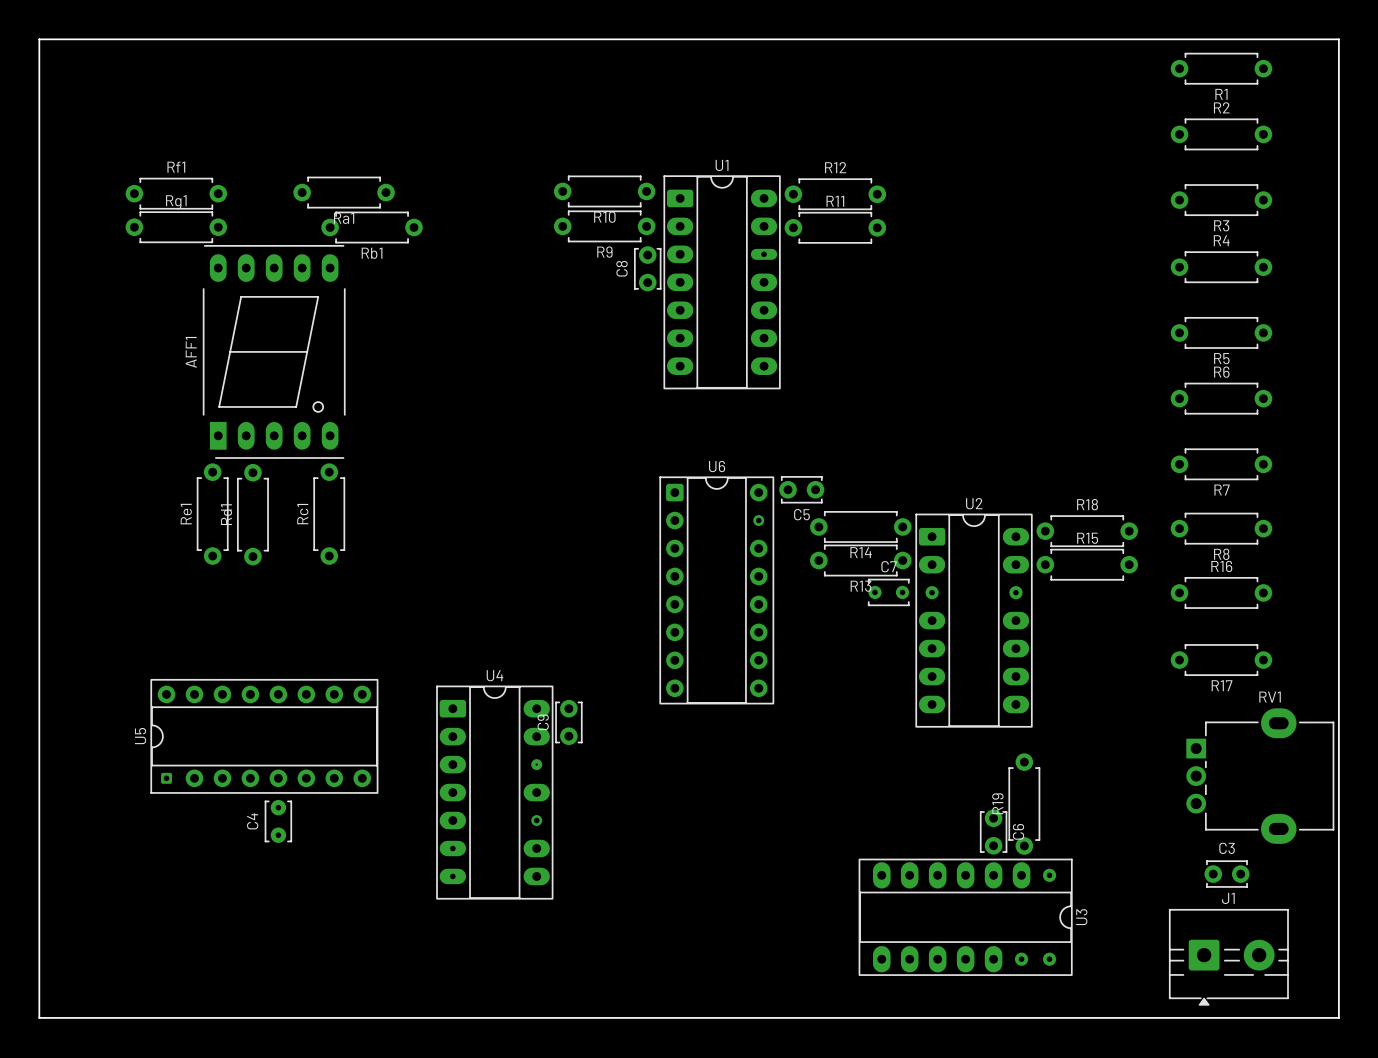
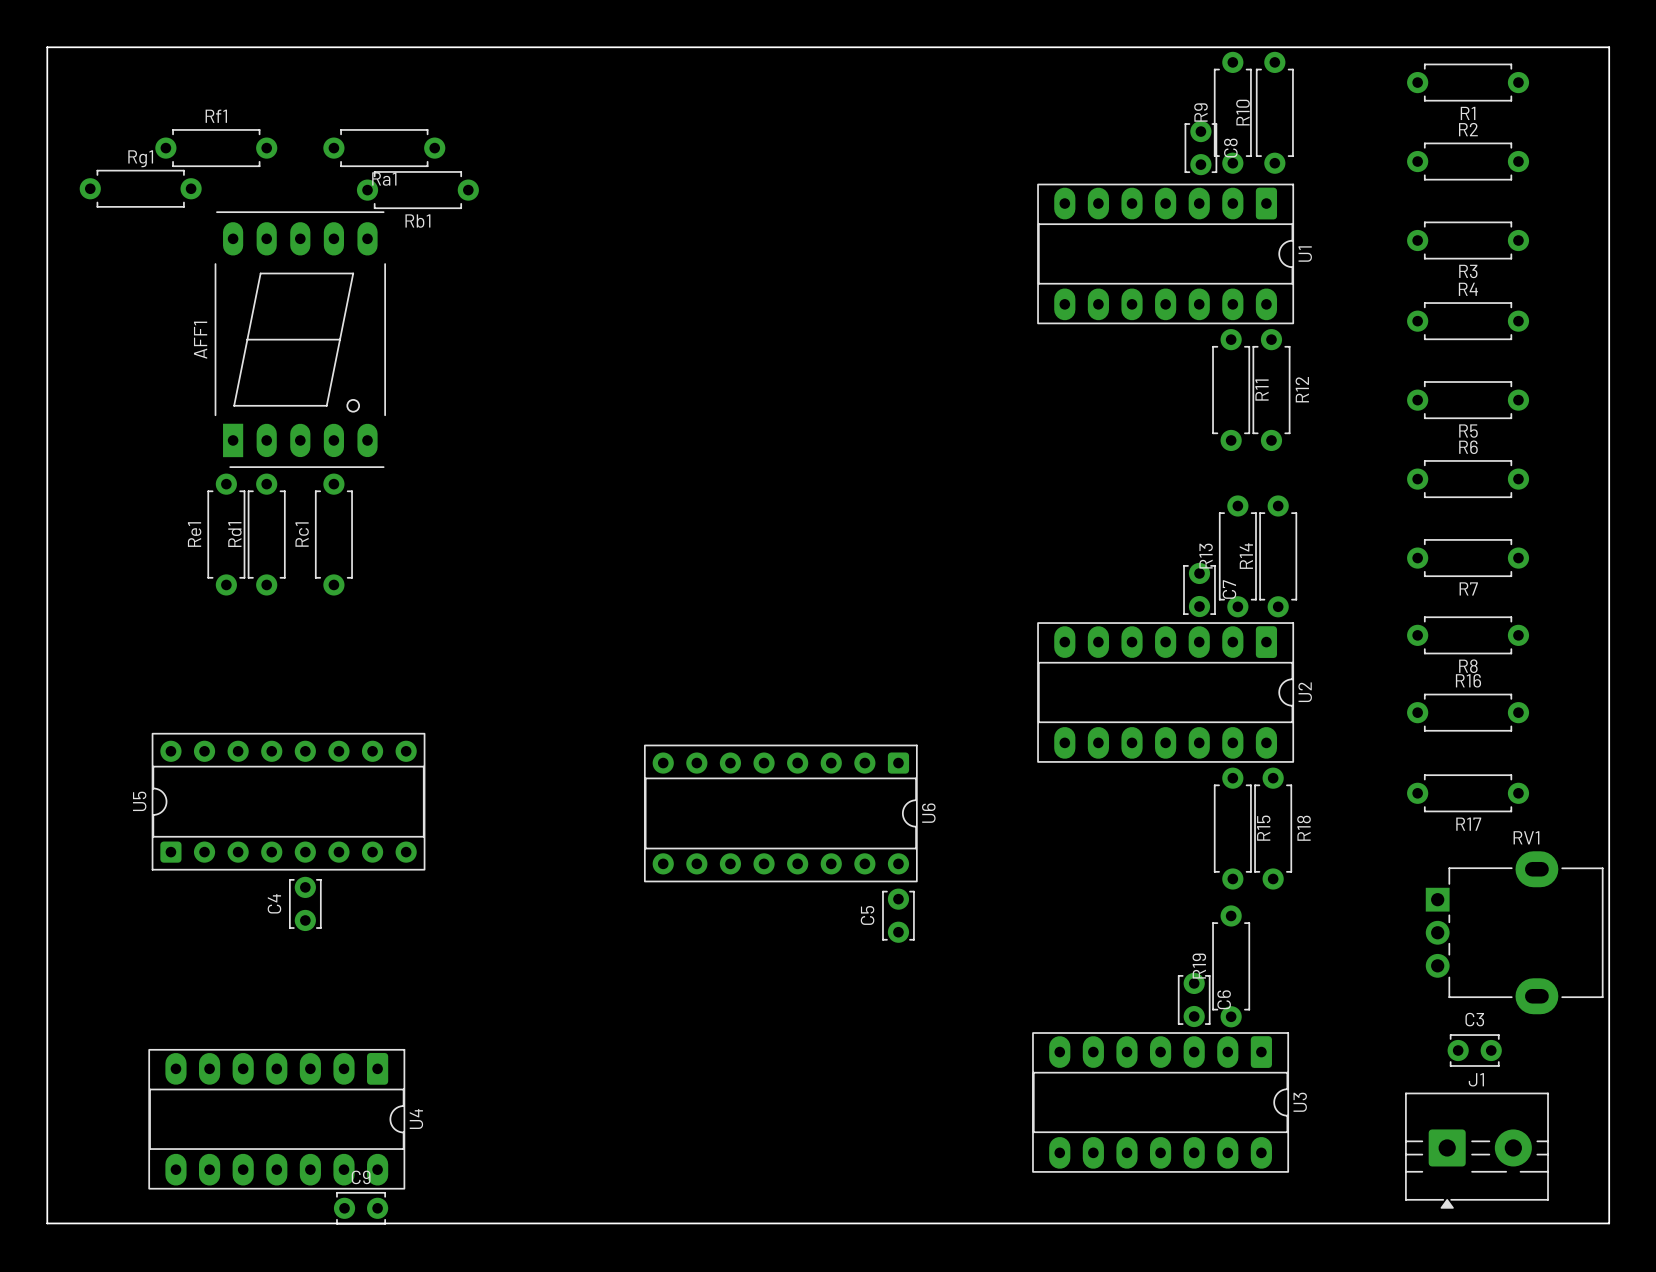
U1 name position: U1 (722, 165) -> U1 (1305, 254)
U1 footprint: [663, 175, 781, 390] -> [1037, 183, 1295, 325]
R10 rotation: 0° (604, 191) -> 90° clockwise (1274, 112)
R10 position: (604, 191) -> (1274, 112)
Ra1 position: (344, 192) -> (384, 148)
Rf1 position: (176, 193) -> (216, 148)
R12 rotation: 0° (835, 194) -> 90° clockwise (1271, 390)
R12 position: (835, 194) -> (1271, 390)
R9 rotation: 0° (604, 226) -> 90° clockwise (1232, 112)
R9 position: (604, 226) -> (1232, 112)
Rg1 position: (176, 227) -> (140, 188)
Rb1 position: (372, 227) -> (417, 190)
R11 rotation: 0° (835, 227) -> 90° clockwise (1231, 390)
R11 position: (835, 227) -> (1231, 390)
C8 name position: C8 (622, 268) -> C8 (1230, 147)
C8 position: (647, 268) -> (1200, 148)
AFF1 position: (274, 351) -> (300, 339)
U6 name position: U6 (717, 466) -> U6 (928, 813)
U6 footprint: [659, 476, 775, 705] -> [644, 744, 918, 883]
C5 rotation: 0° (801, 489) -> 90° clockwise (898, 915)
C5 position: (801, 489) -> (898, 915)
U2 name position: U2 (974, 503) -> U2 (1305, 692)
U2 footprint: [915, 513, 1033, 728] -> [1037, 622, 1295, 763]
Re1 position: (212, 514) -> (226, 534)
Rd1 position: (252, 514) -> (266, 534)
Rc1 position: (329, 514) -> (333, 534)
R14 rotation: 0° (860, 526) -> 90° clockwise (1278, 556)
R14 position: (860, 526) -> (1278, 556)
R18 rotation: 0° (1087, 531) -> 90° clockwise (1273, 828)
R18 position: (1087, 531) -> (1273, 828)
R13 rotation: 0° (860, 560) -> 90° clockwise (1237, 556)
R13 position: (860, 560) -> (1237, 556)
R15 rotation: 0° (1087, 564) -> 90° clockwise (1232, 828)
R15 position: (1087, 564) -> (1232, 828)
C7 name position: C7 (889, 566) -> C7 (1229, 589)
C7 footprint: [868, 578, 910, 606] -> [1183, 562, 1216, 618]
U4 name position: U4 (494, 675) -> U4 (416, 1119)
U5 footprint: [150, 679, 379, 794] -> [151, 732, 426, 871]
U4 footprint: [436, 685, 554, 900] -> [148, 1049, 406, 1190]
C9 rotation: 0° (568, 722) -> 90° clockwise (361, 1208)
C9 position: (568, 722) -> (361, 1208)
C4 footprint: [264, 799, 292, 843] -> [289, 876, 322, 932]
U3 footprint: [858, 858, 1073, 976] -> [1032, 1032, 1289, 1173]

